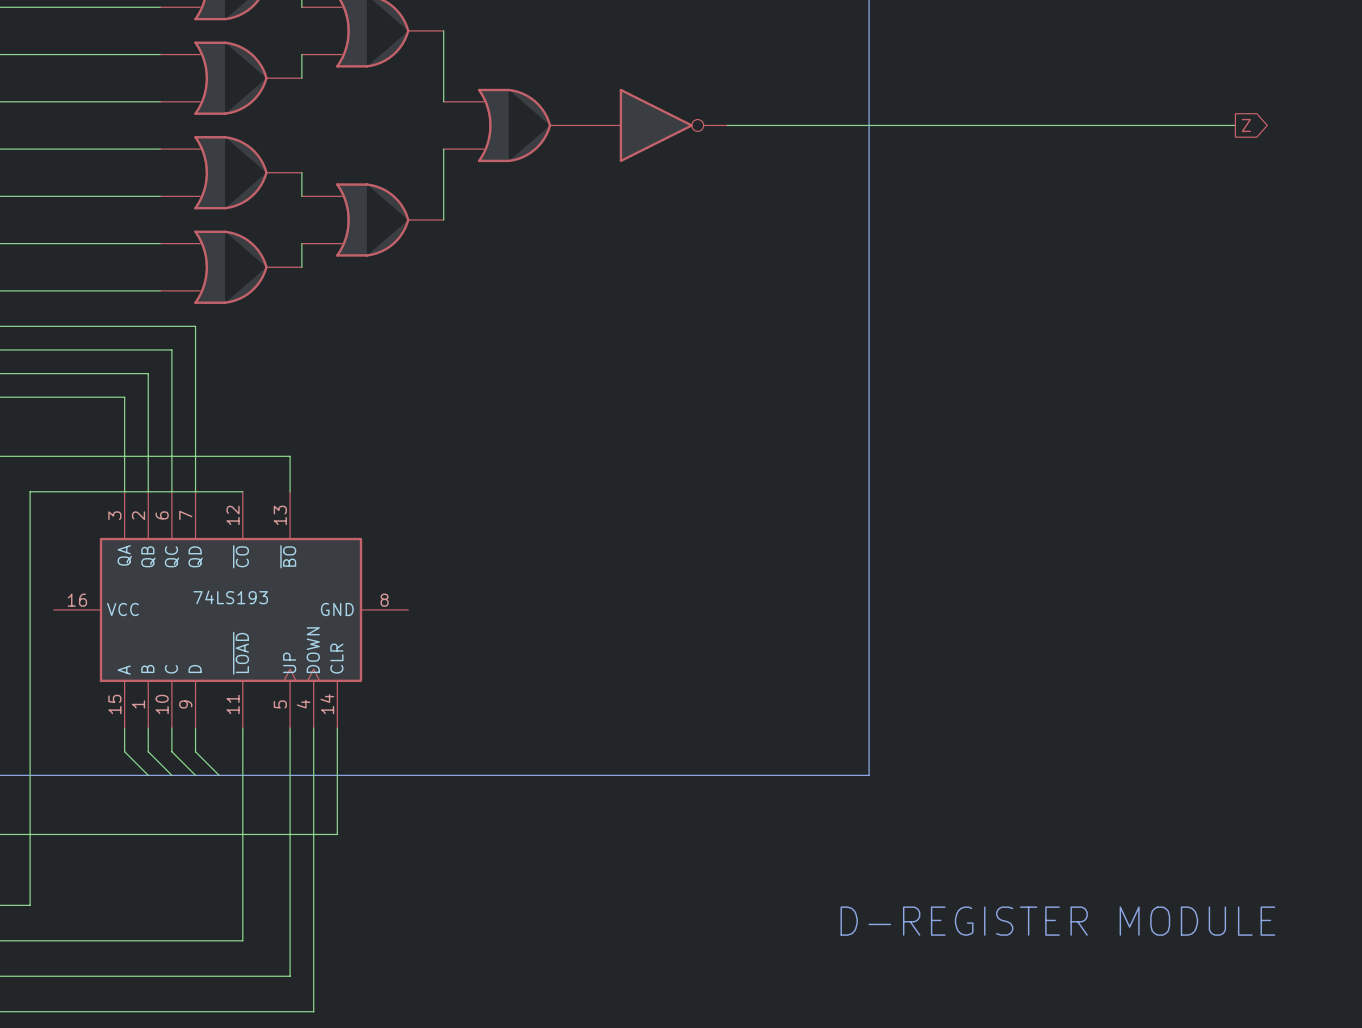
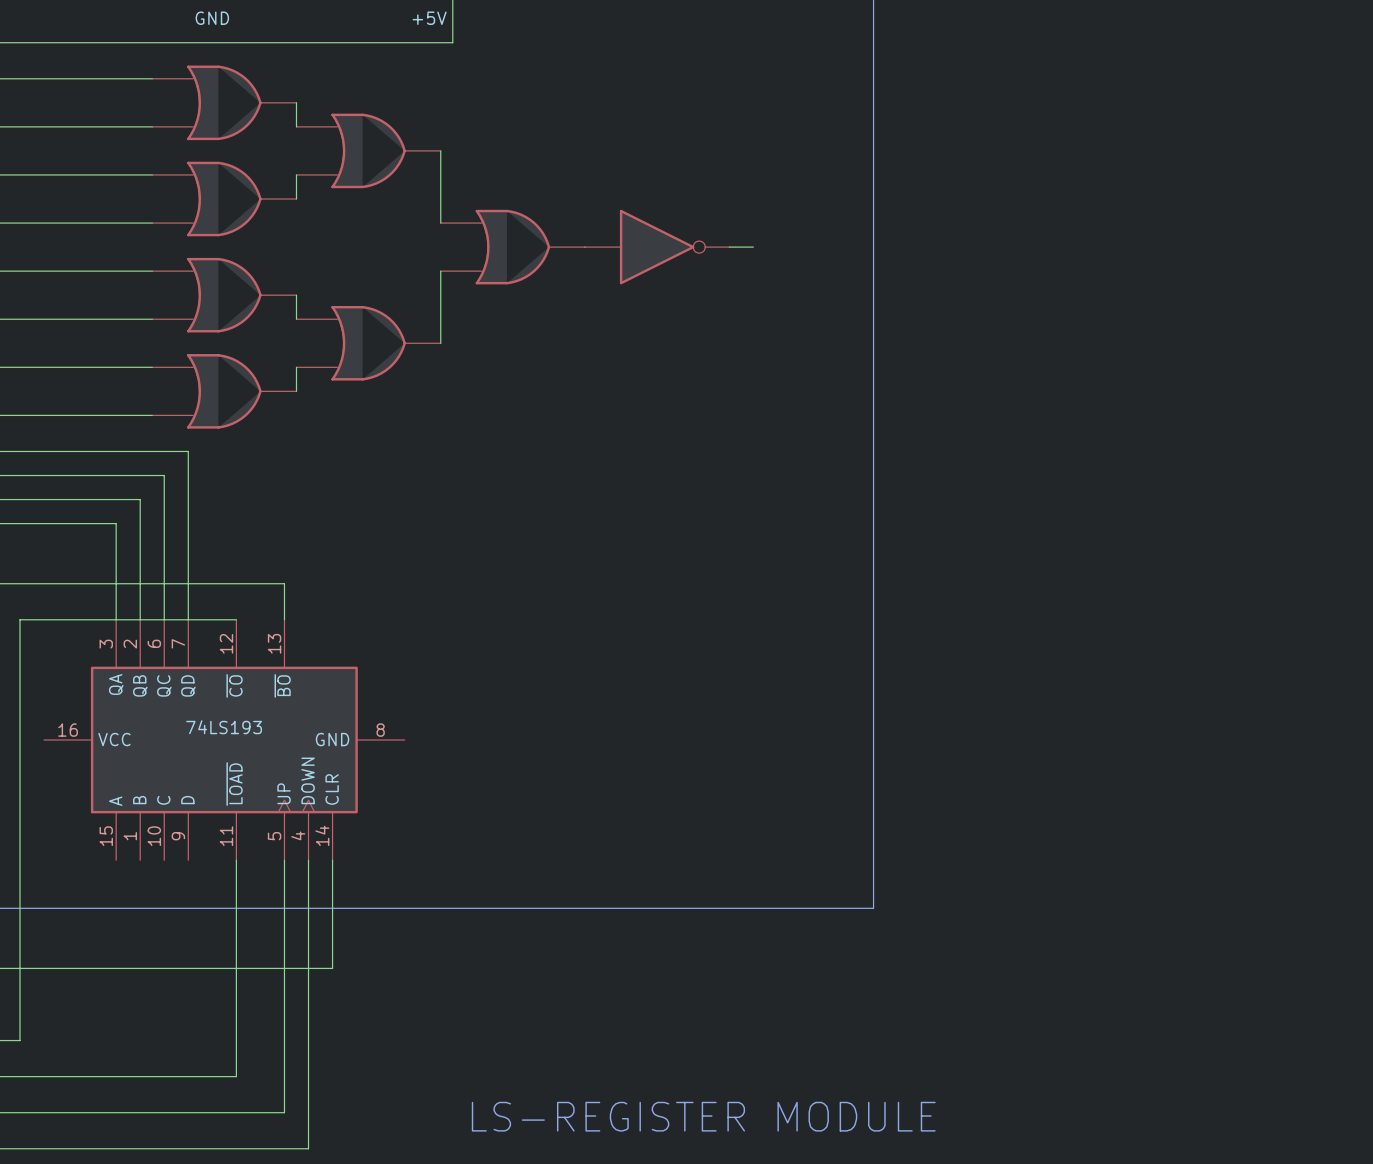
wire: (750, 125) (1235, 125) -> none
global label: Z (1246, 125) -> none
wire: (124, 728) (124, 751) (148, 775) -> none
wire: (148, 728) (148, 751) (171, 775) -> none
wire: (171, 728) (171, 751) (195, 775) -> none
wire: (195, 728) (195, 751) (219, 775) -> none
text: D-REGISTER MODULE (1057, 921) -> none
text: none -> LS-REGISTER MODULE (703, 1116)

